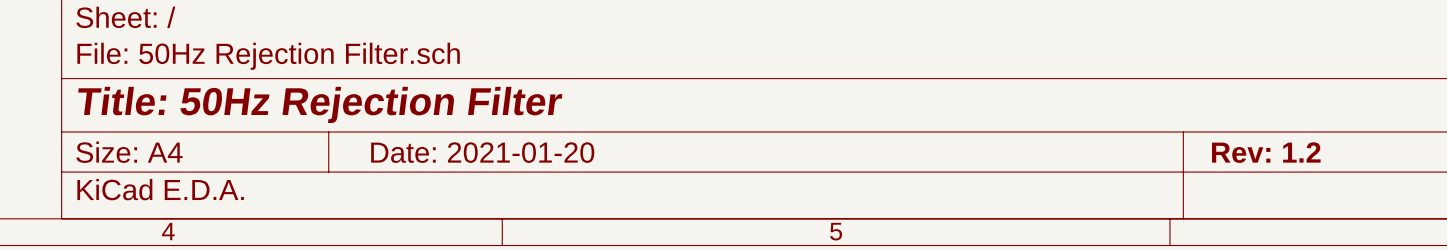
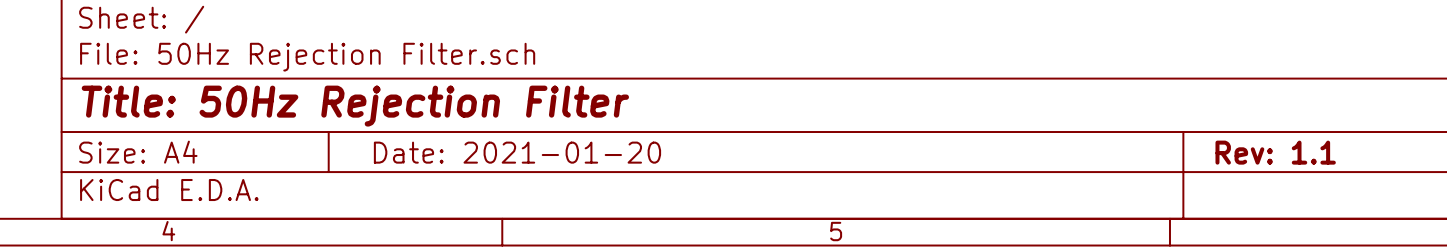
title block: Rev: 1.2 (1266, 152) -> Rev: 1.1 (1275, 152)

